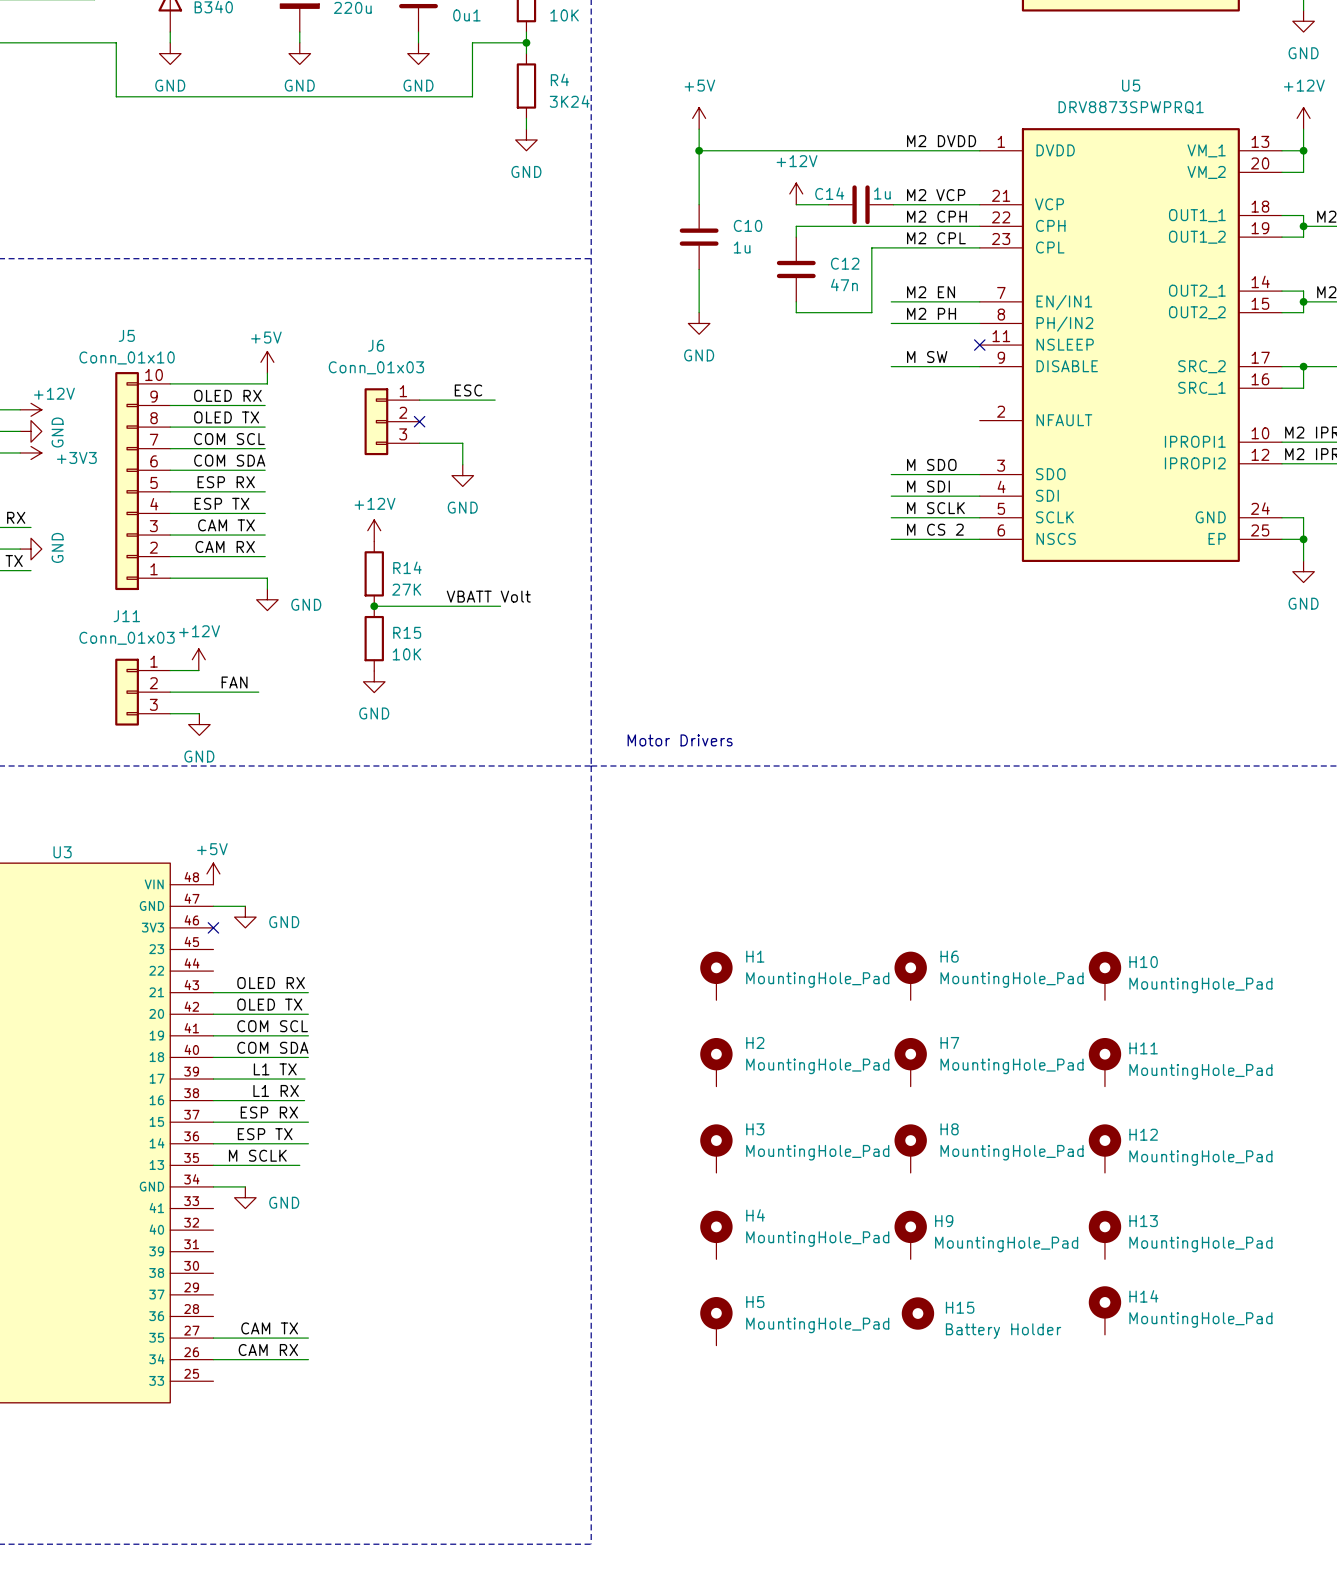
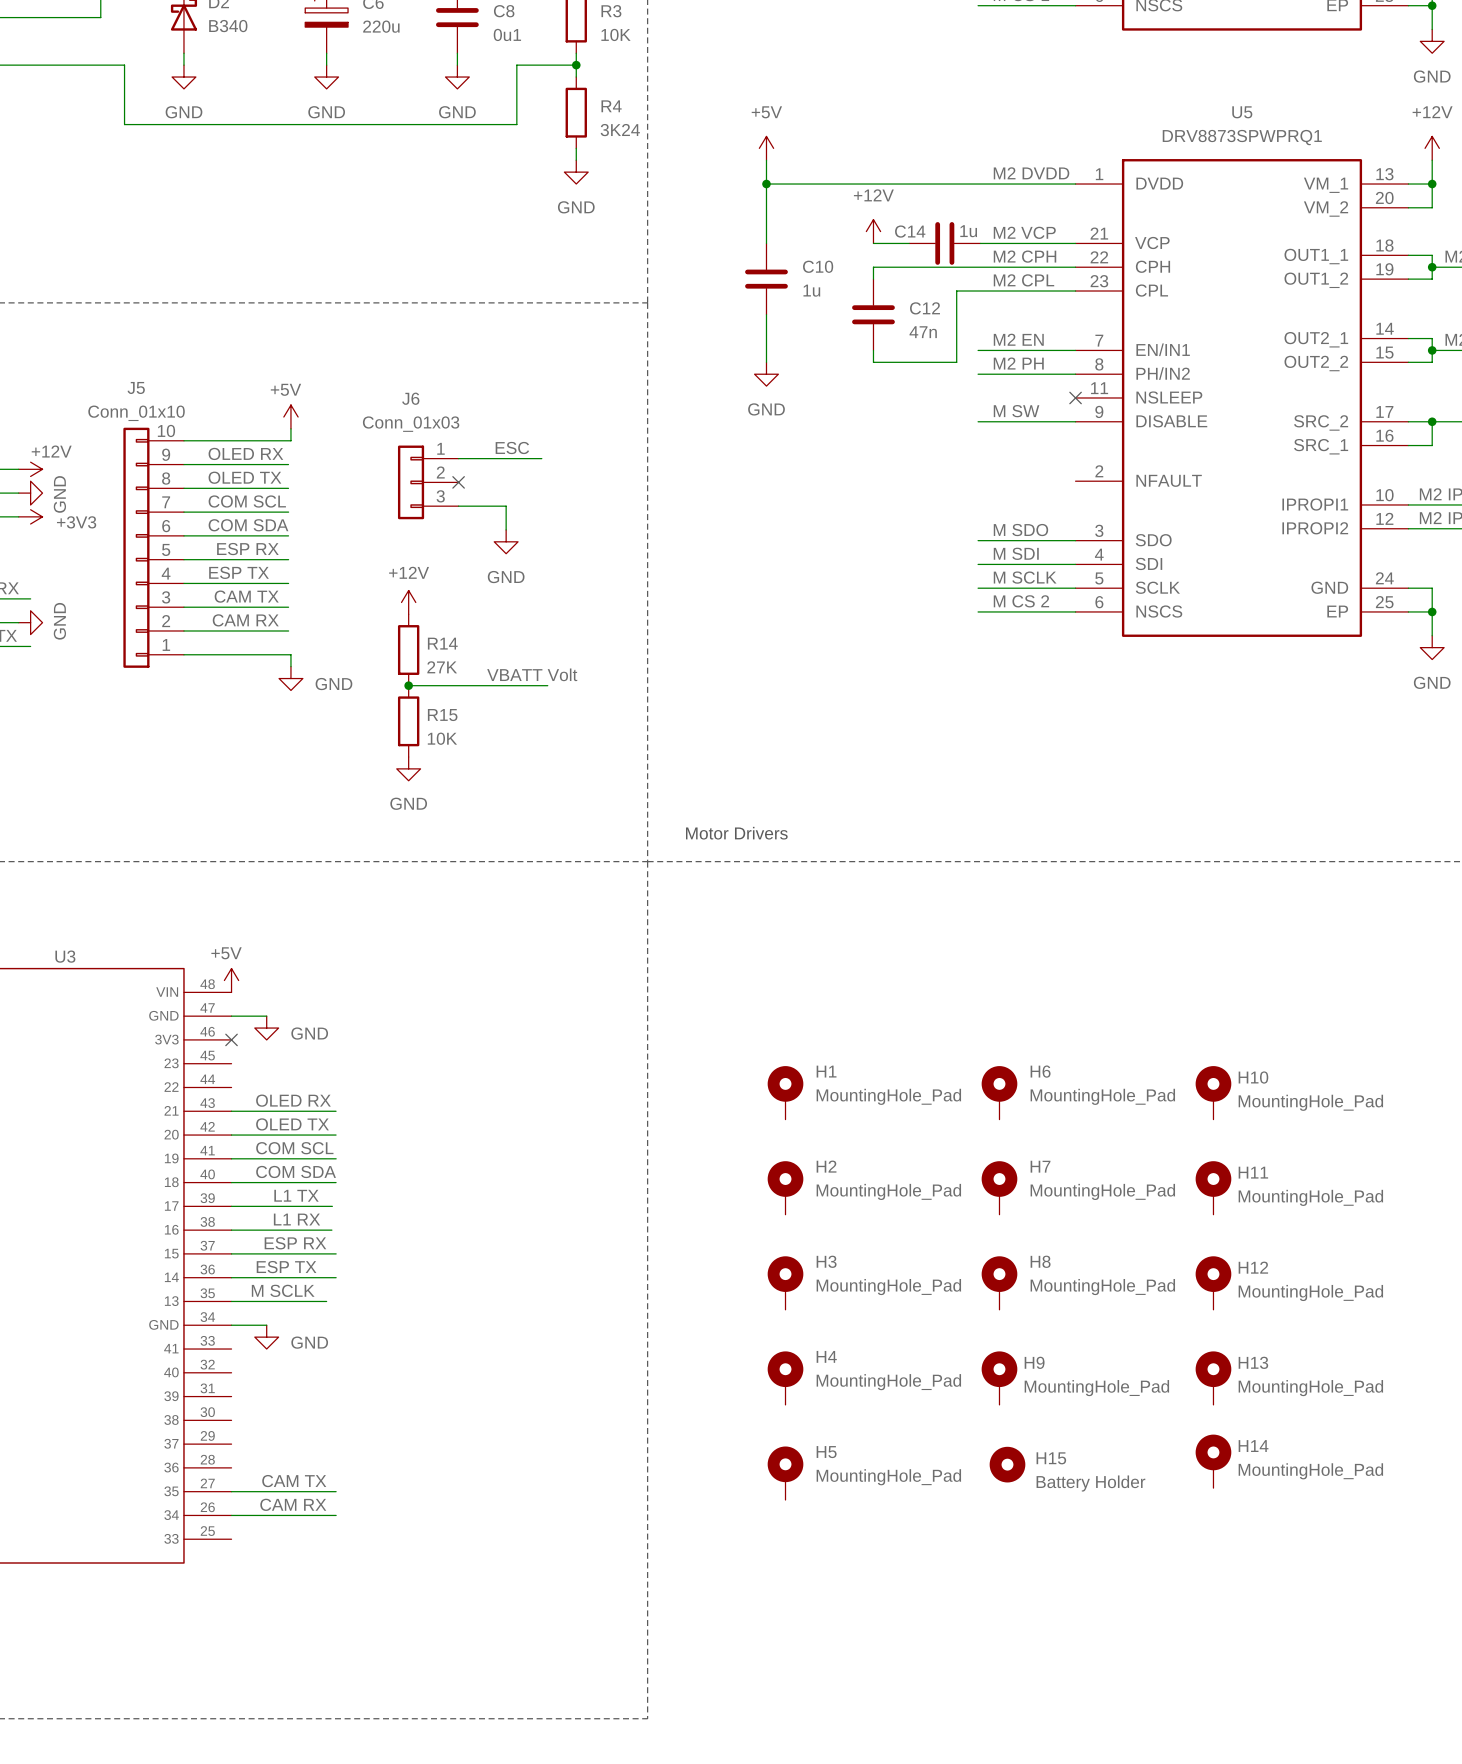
power symbol: +12V (198, 659) -> none
wire: (170, 670) (198, 670) -> none
label: FAN (234, 682) -> none
J11: Conn_01x03 (142, 692) -> none
wire: (170, 692) (258, 692) -> none
wire: (170, 713) (199, 713) -> none
power symbol: GND (199, 724) -> none

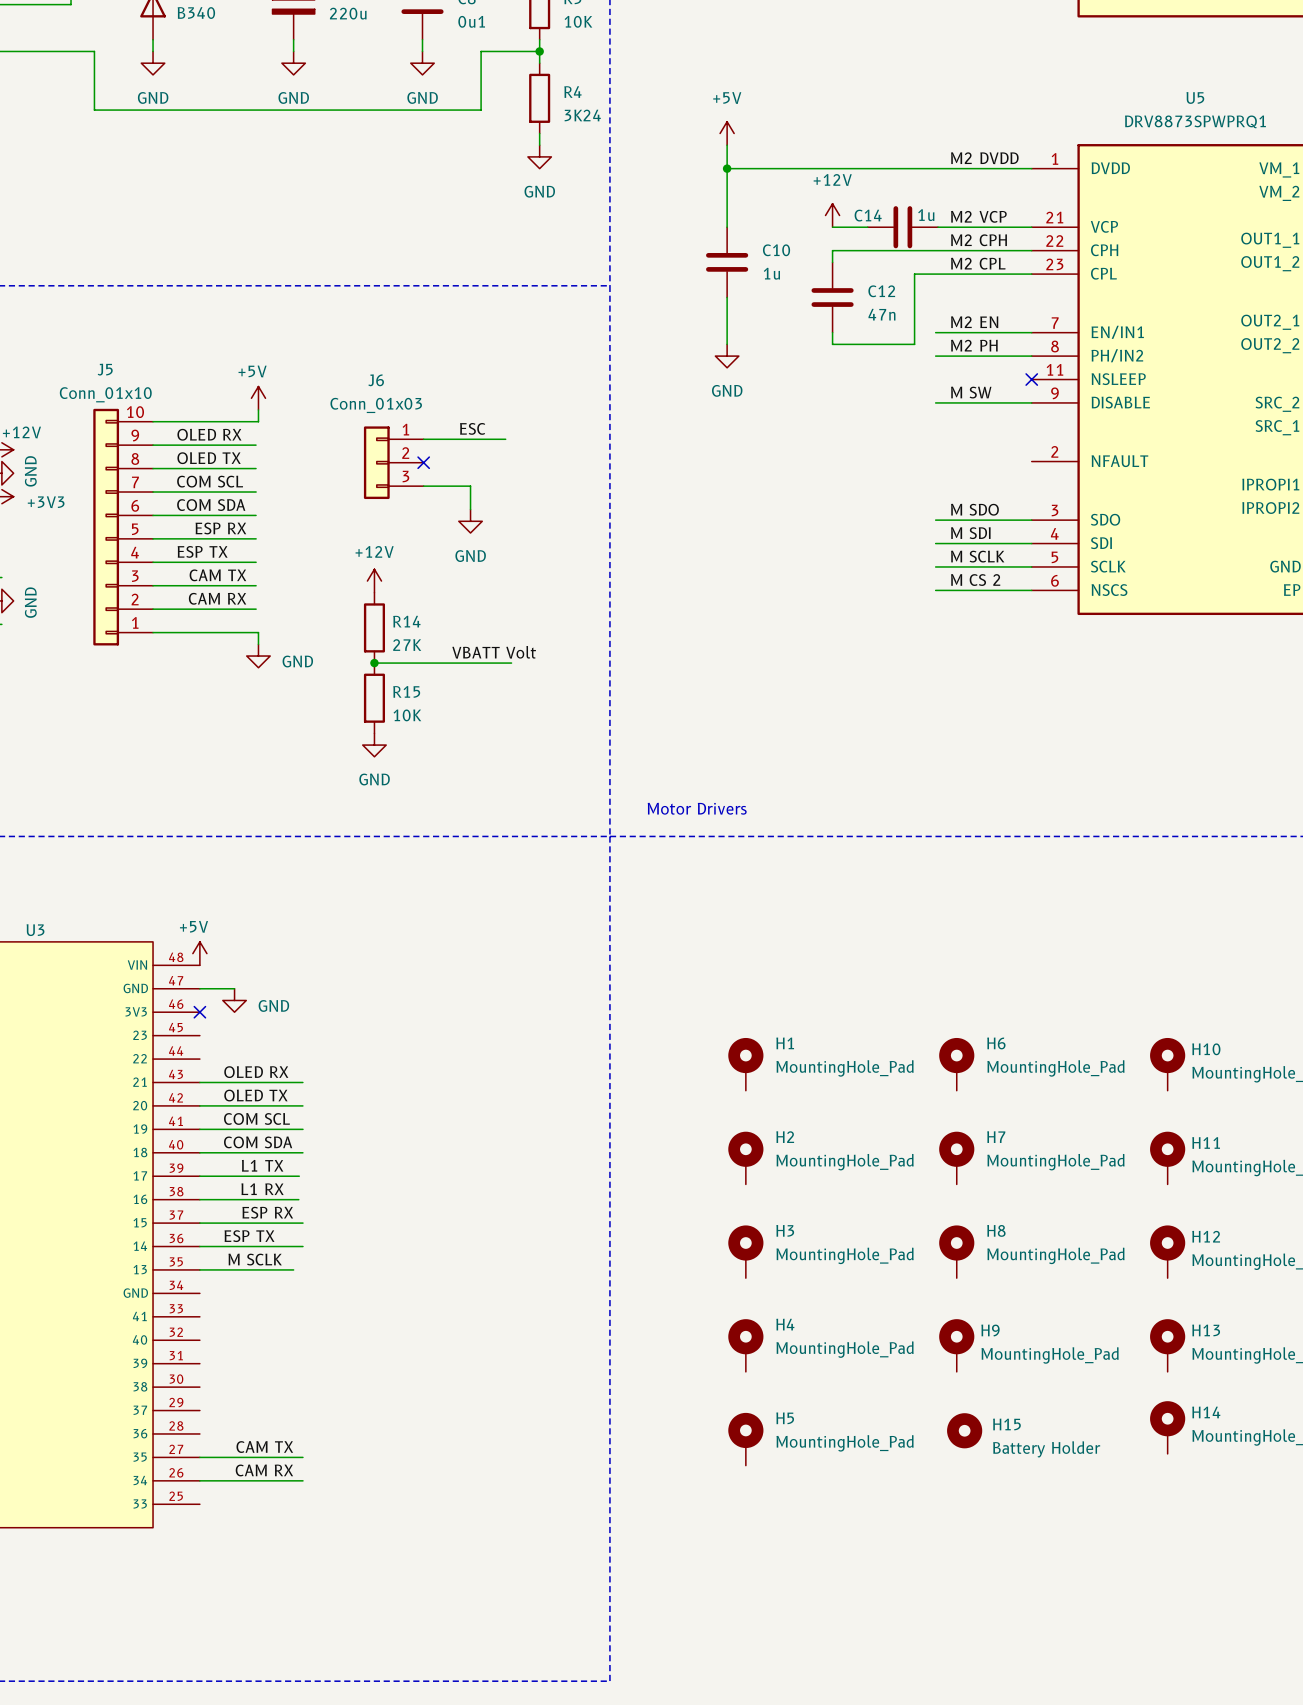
wire: (231, 1325) (266, 1325) -> none
power symbol: GND (266, 1337) -> none

